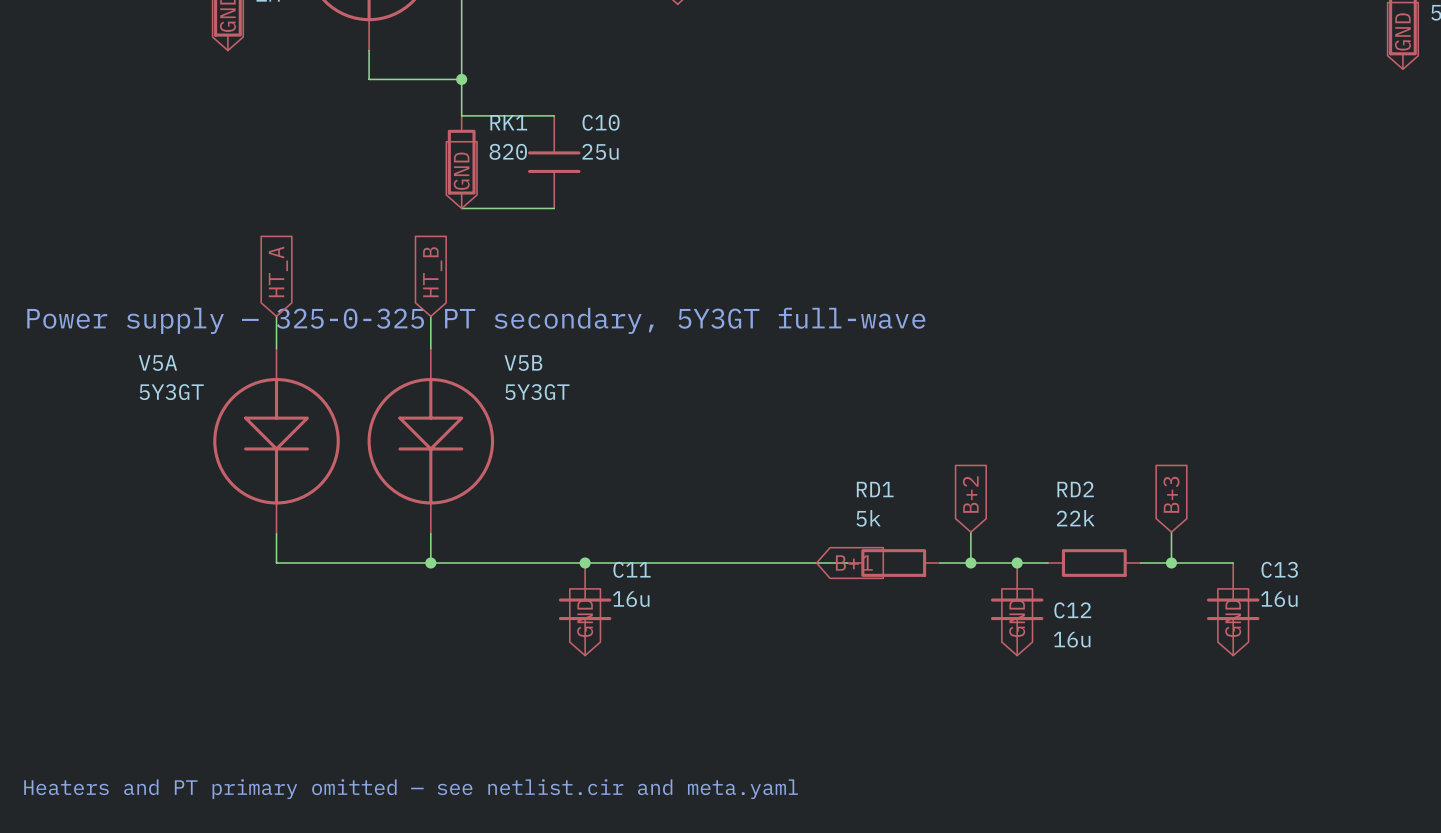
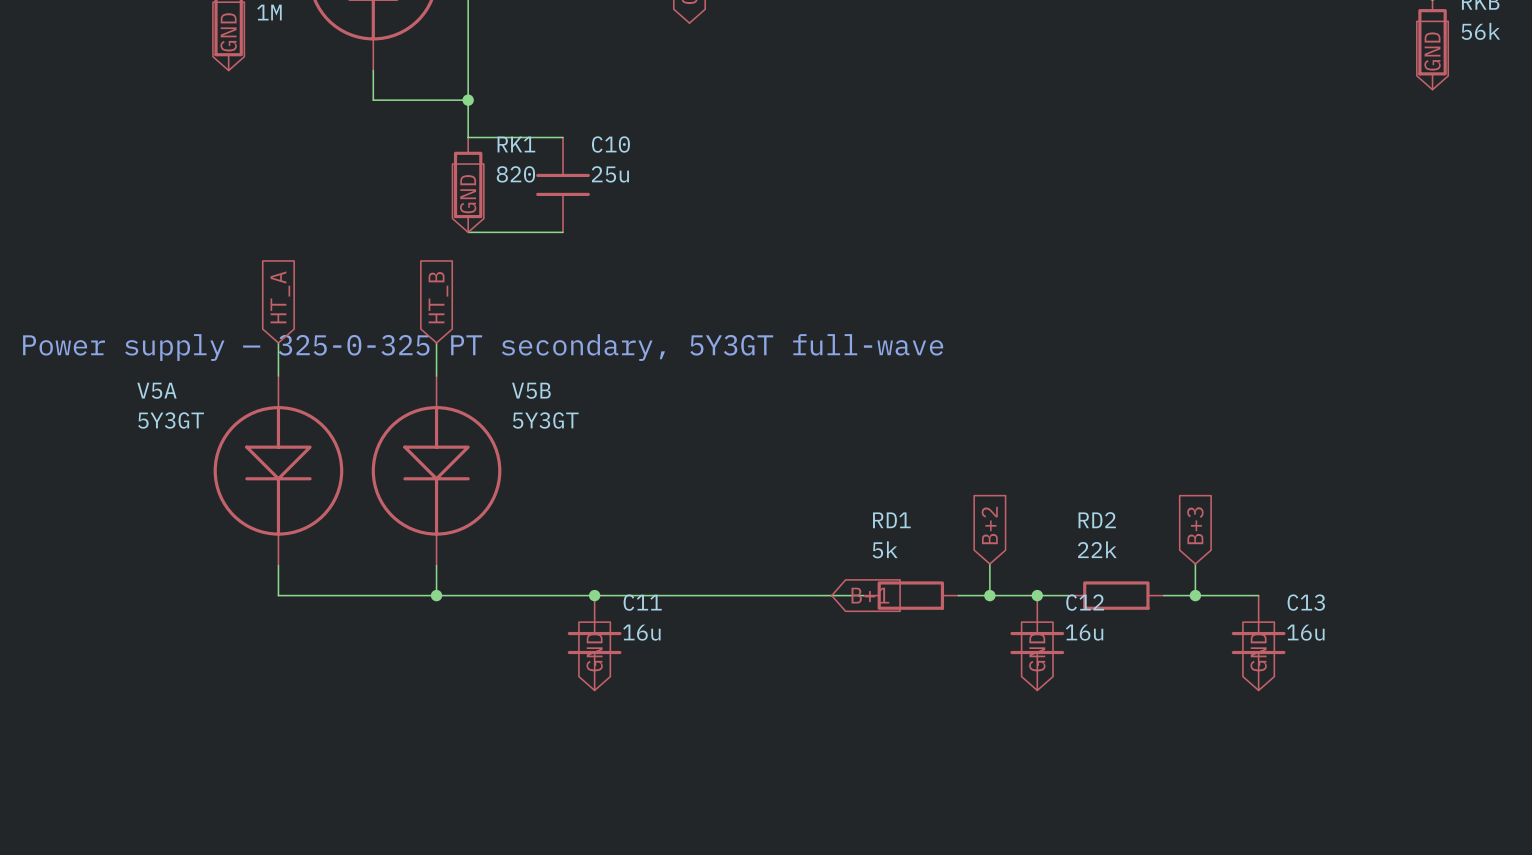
C12 name position: C12 (1072, 610) -> C12 (1085, 602)
C12 value position: 16u (1072, 639) -> 16u (1084, 632)
text: Heaters and PT primary omitted — see netlist.cir and meta.yaml (411, 789) -> none

